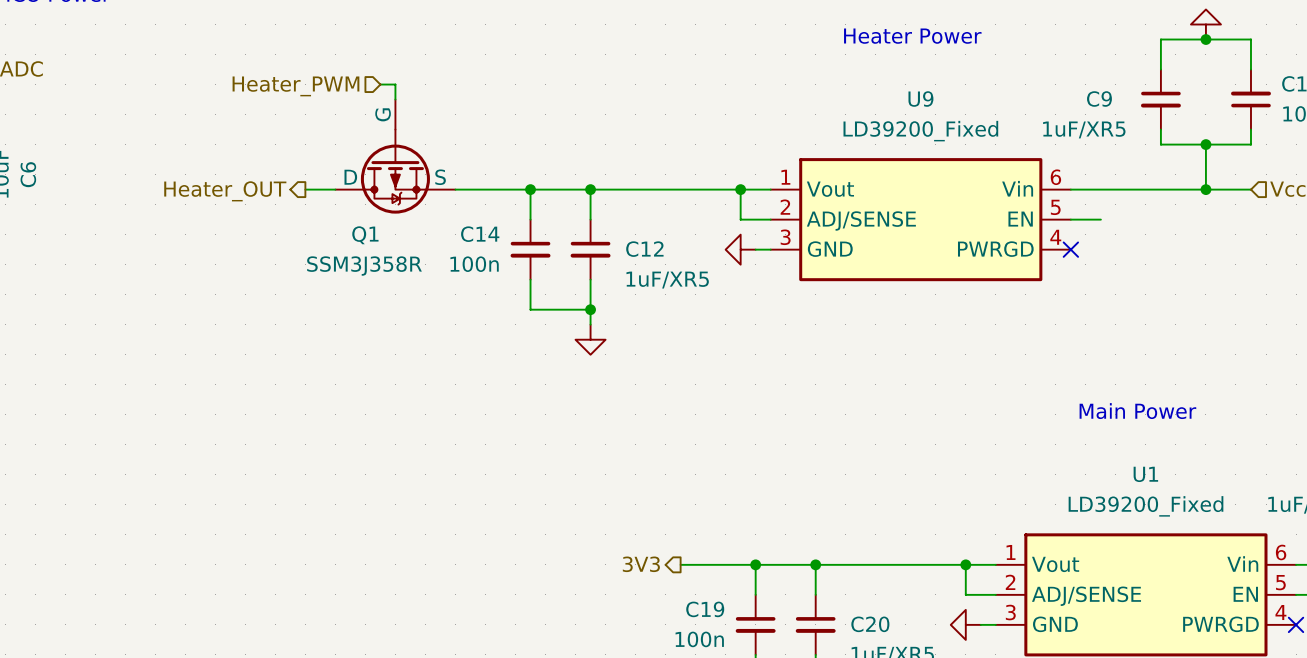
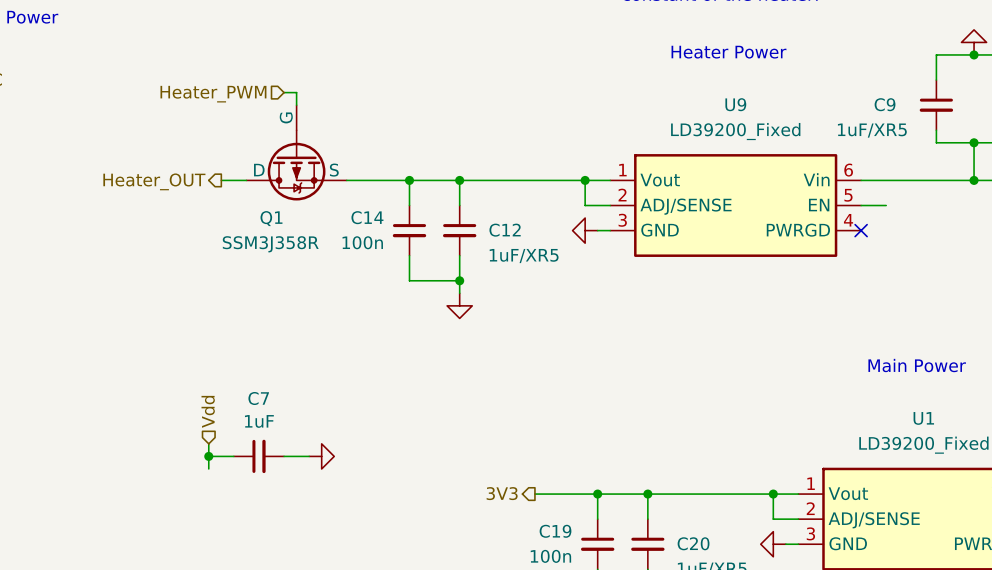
hierarchical label: none -> Vdd (208, 411)
wire: none -> (208, 443) (208, 468)
wire: none -> (208, 456) (233, 456)
junction: none -> (208, 456)
C7: none -> 1uF (258, 456)
wire: none -> (284, 456) (309, 456)
power symbol: none -> (321, 456)

